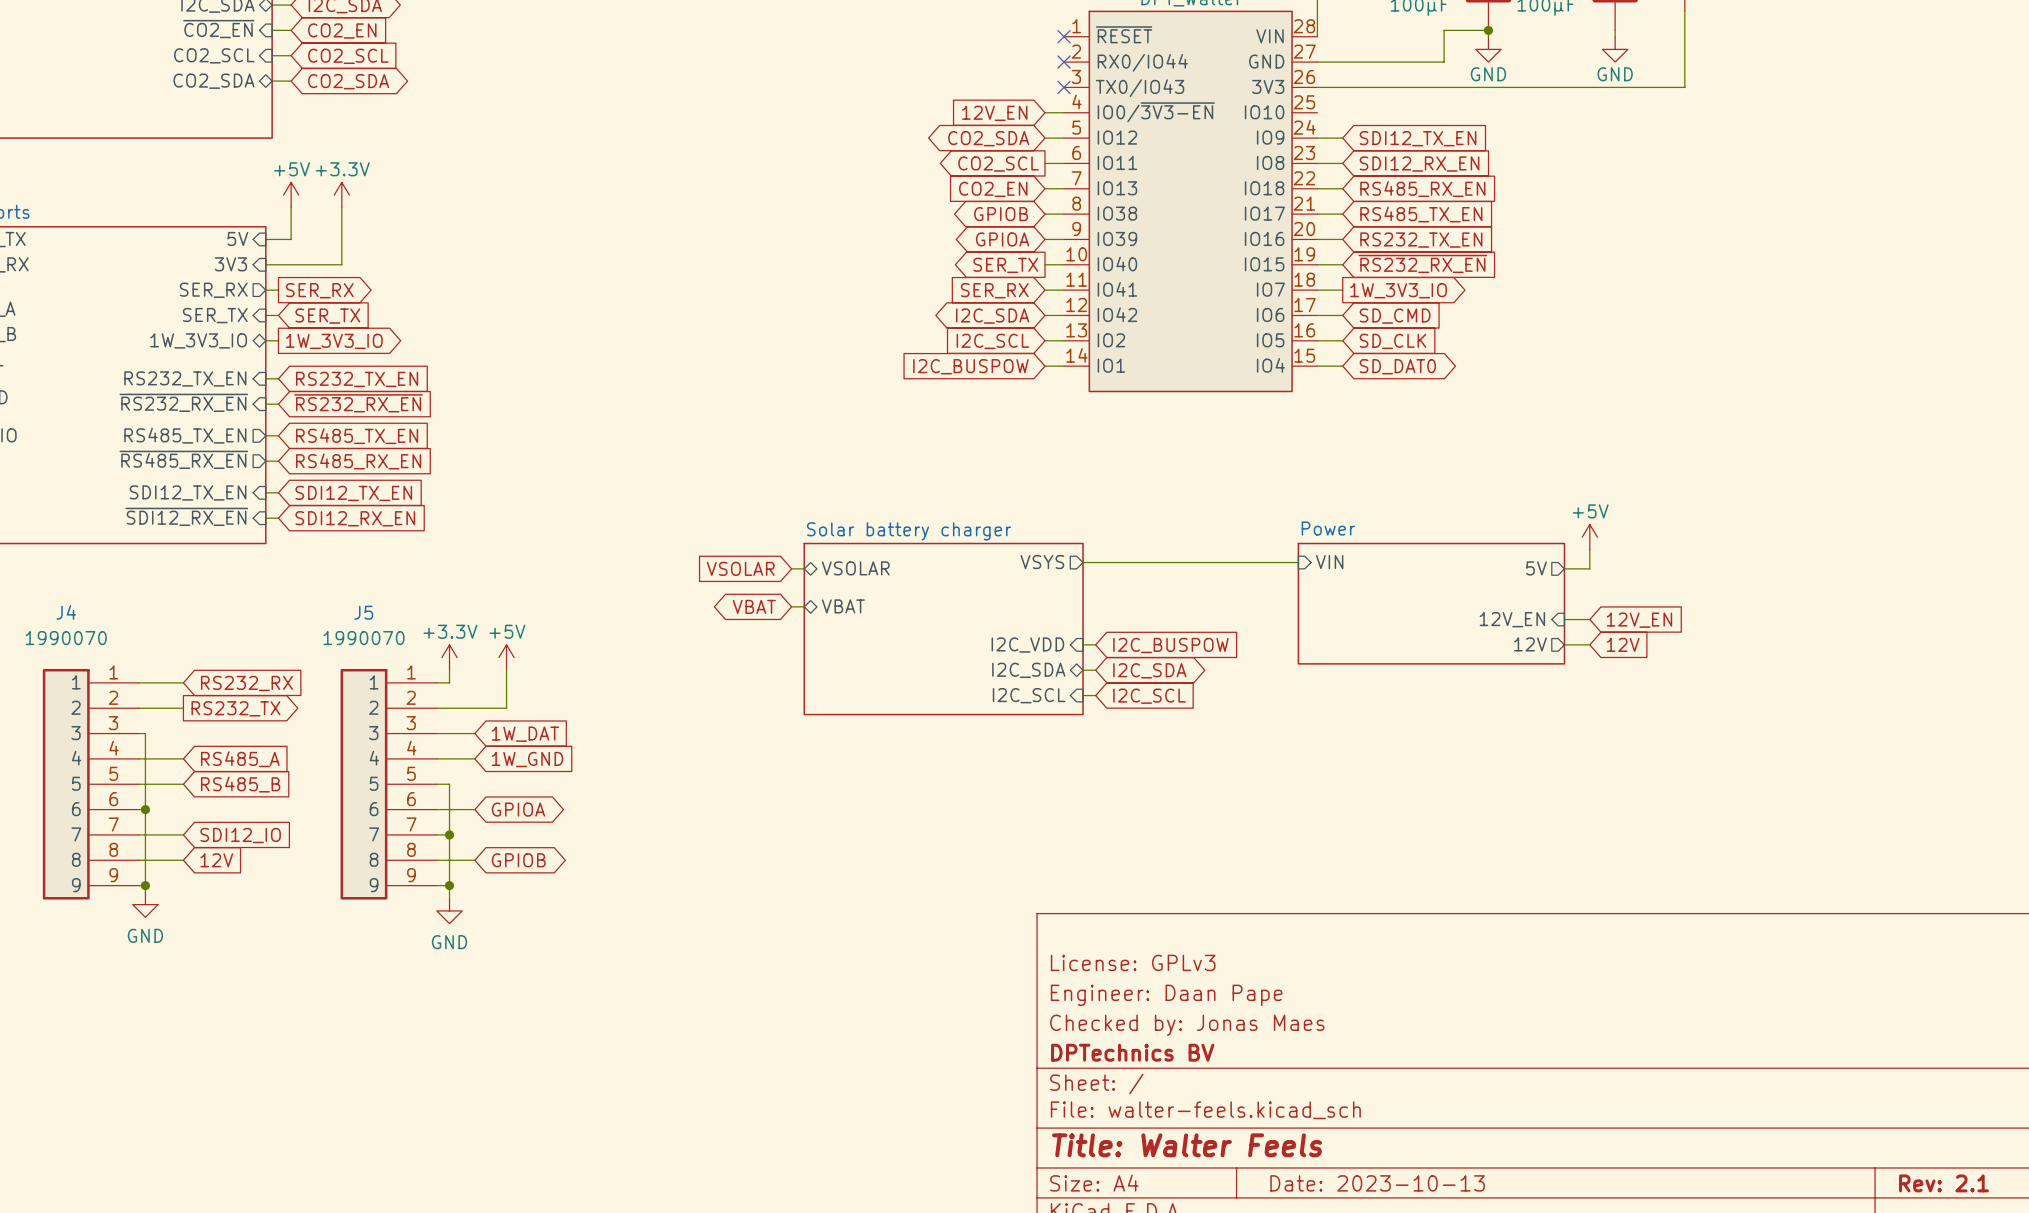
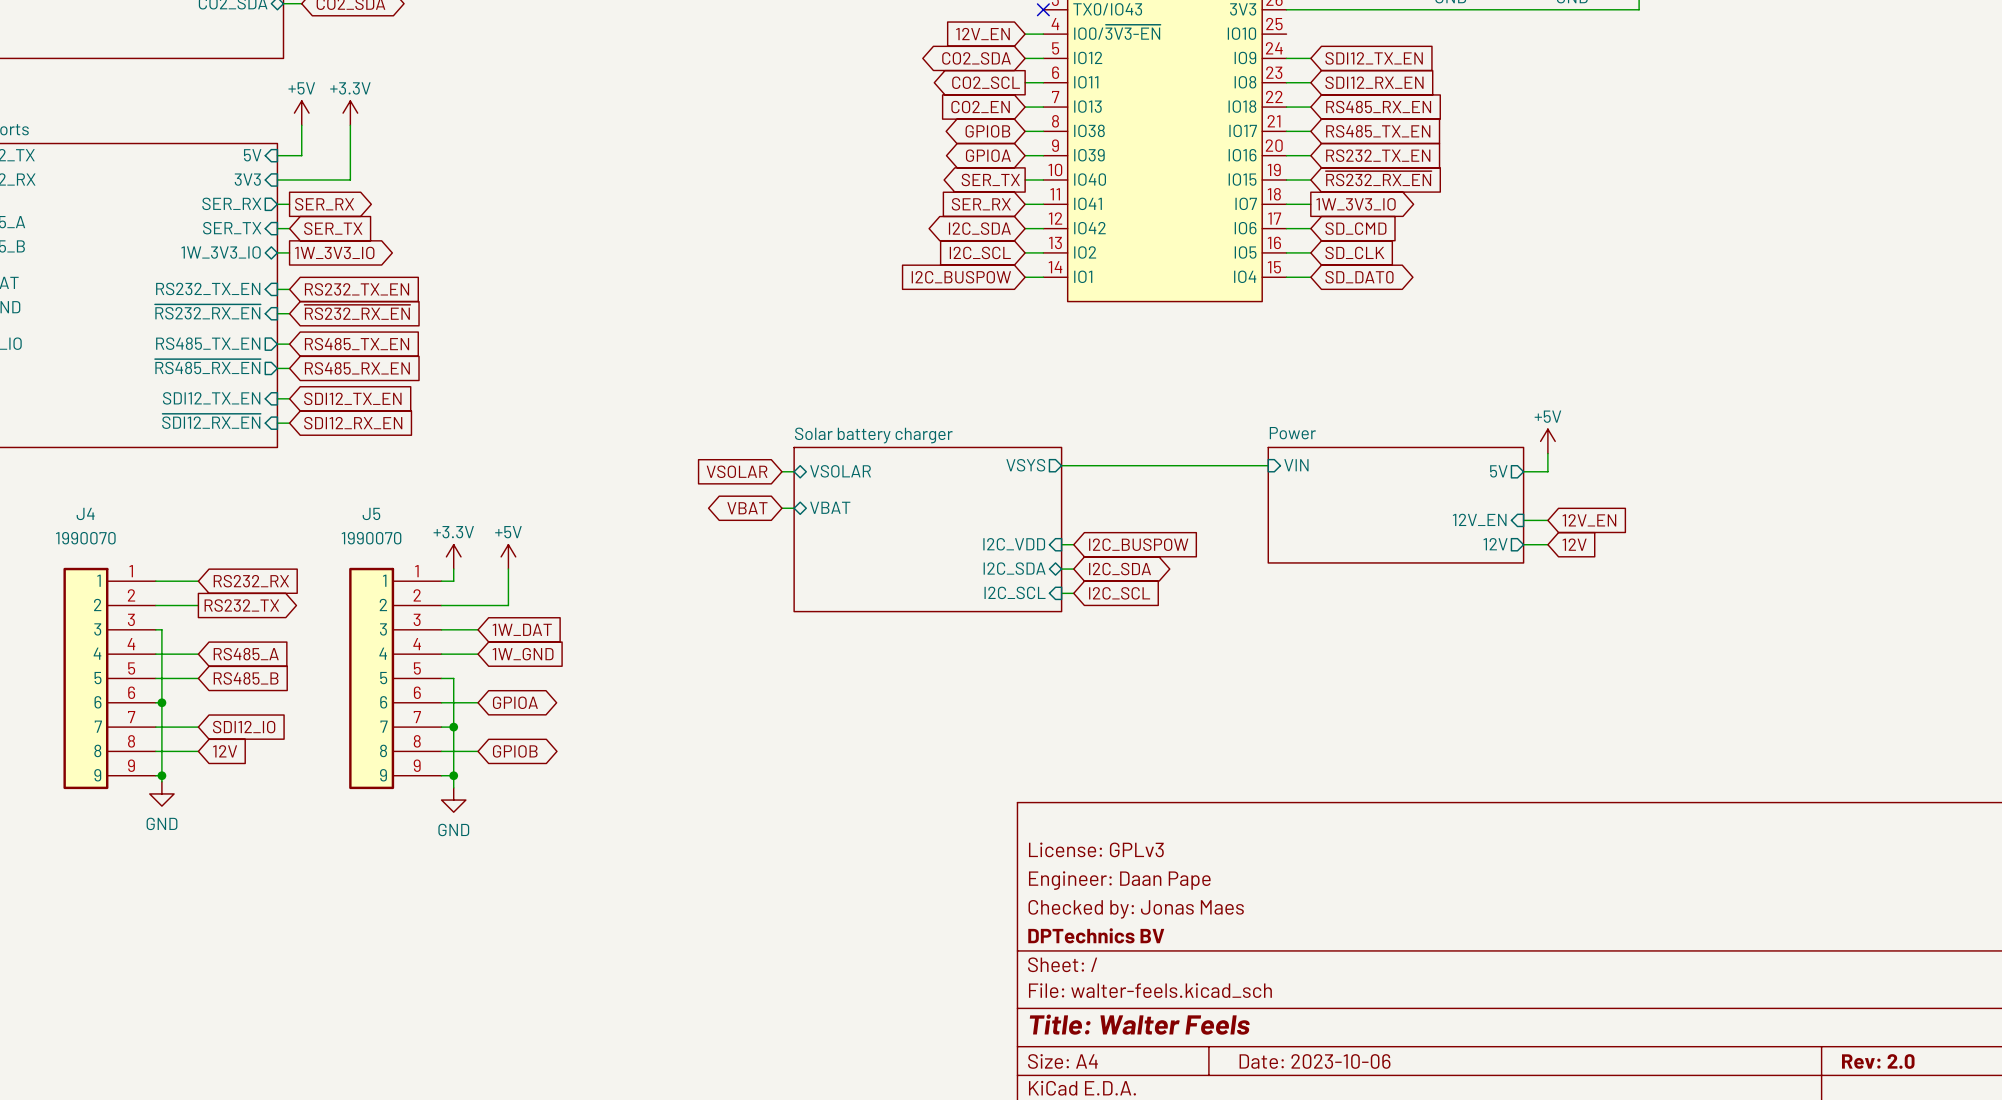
title block: Date: 2023-10-13 (1377, 1183) -> Date: 2023-10-06 (1315, 1061)
title block: Rev: 2.1 (1943, 1183) -> Rev: 2.0 (1878, 1061)

